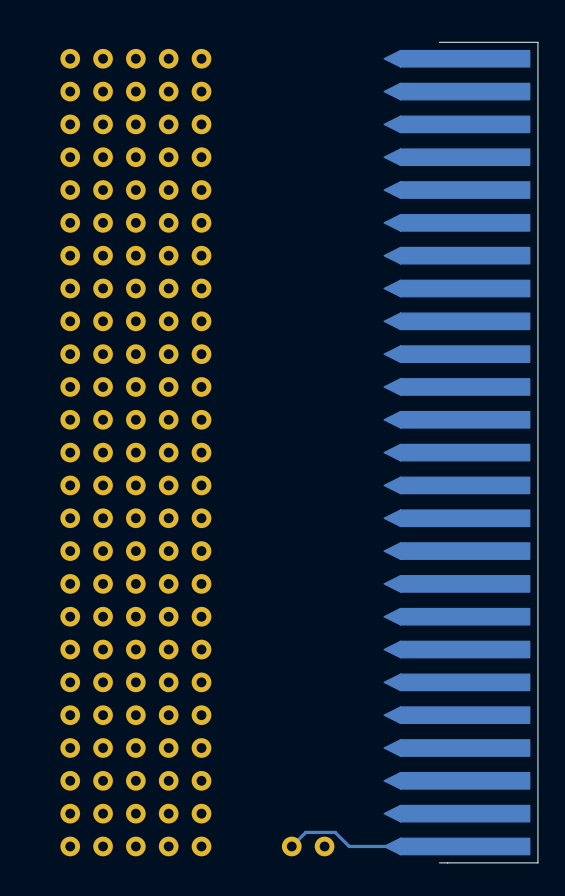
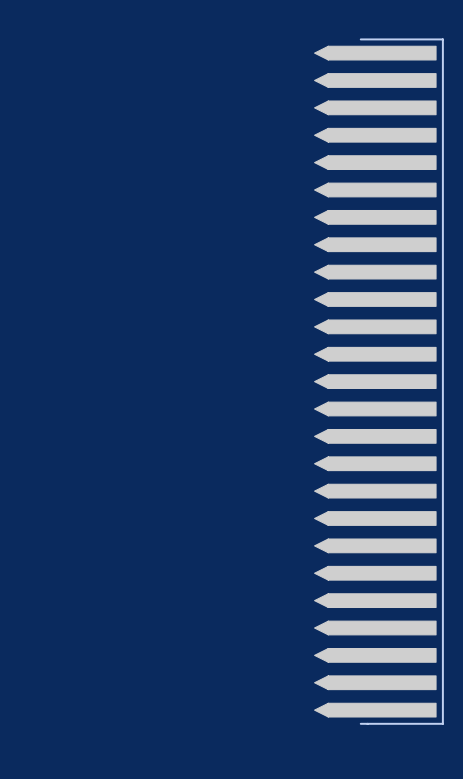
part: (70, 452) -> none
part: (103, 452) -> none
part: (135, 452) -> none
part: (168, 452) -> none
part: (201, 452) -> none
part: (291, 846) -> none
part: (324, 846) -> none
track: (496, 846) (349, 846) (335, 832) (305, 832) (291, 846) -> none

